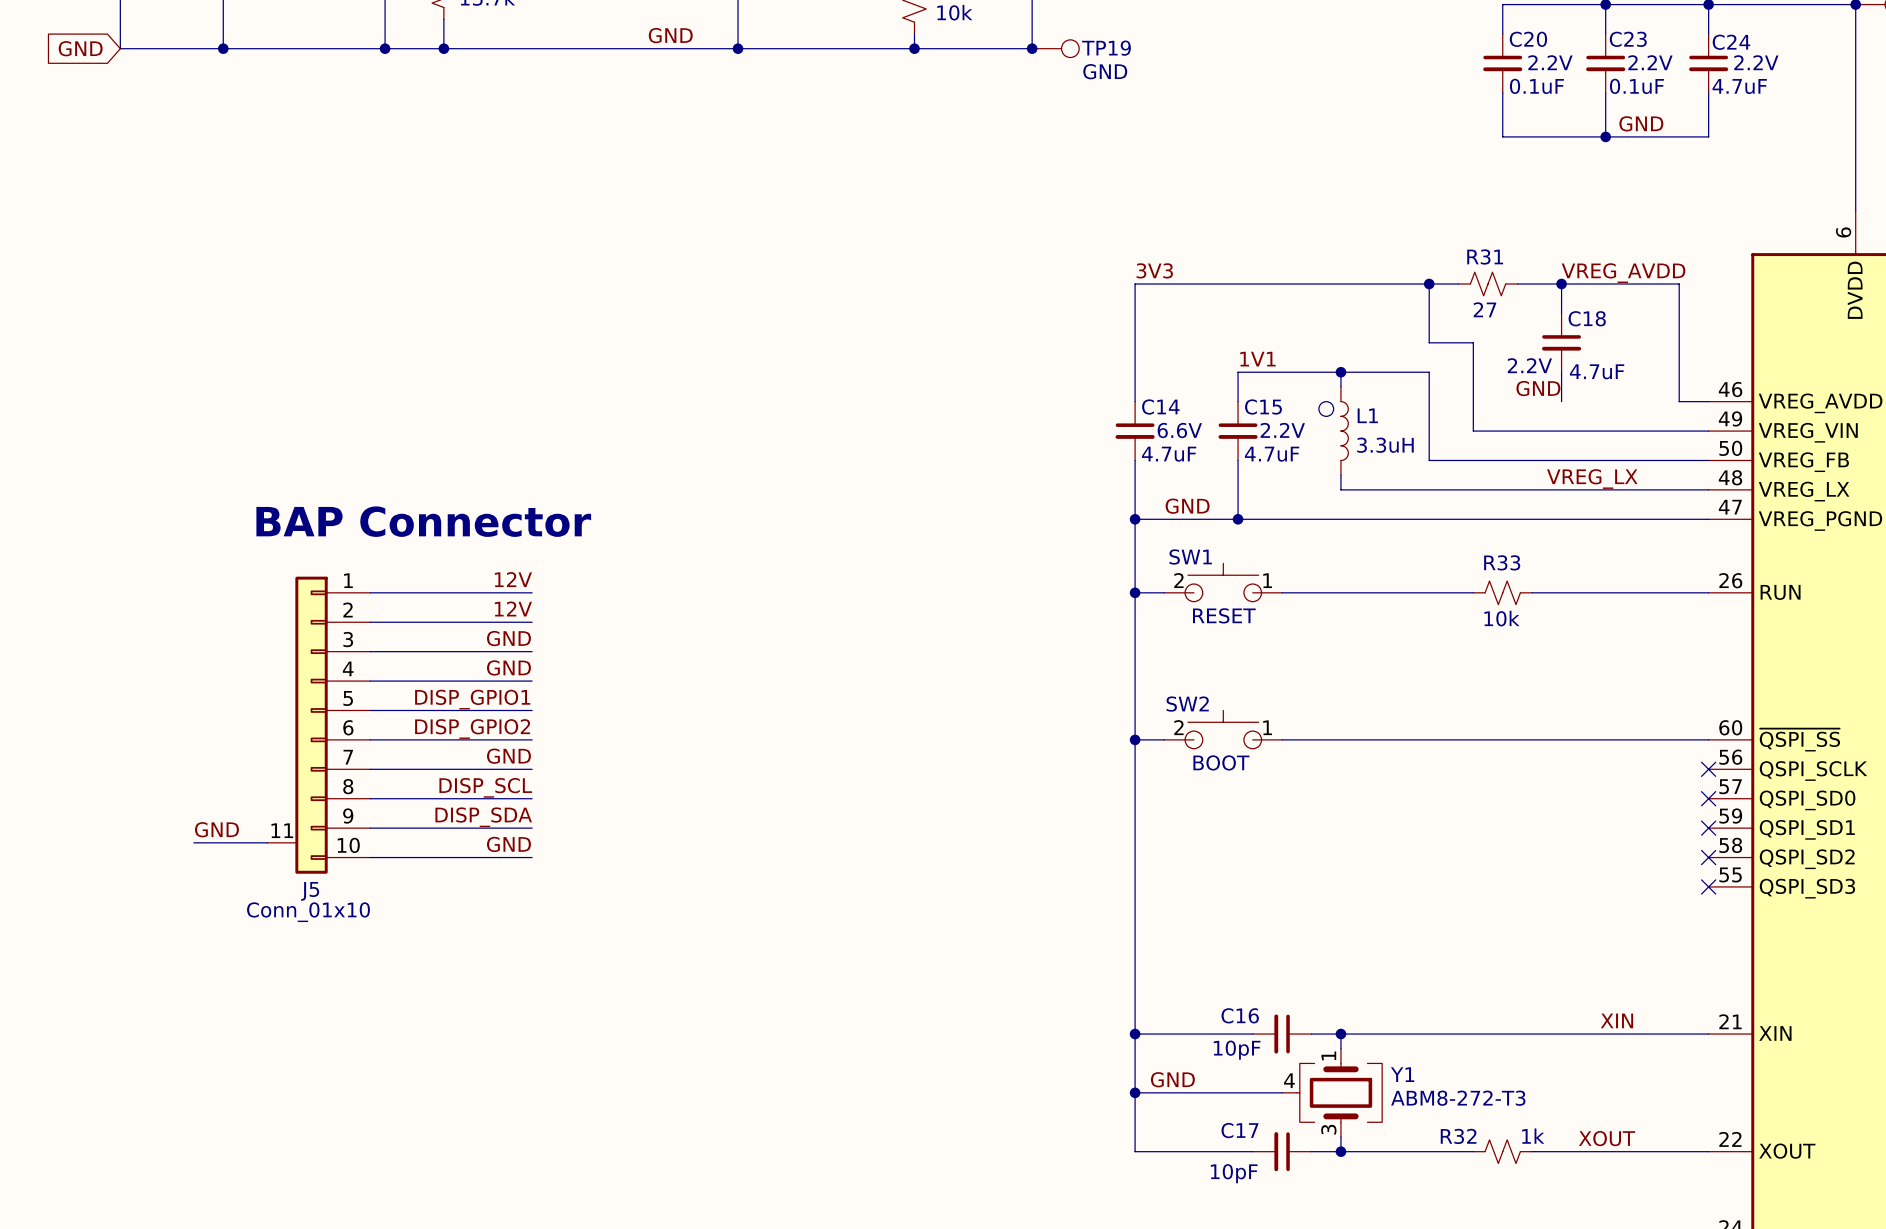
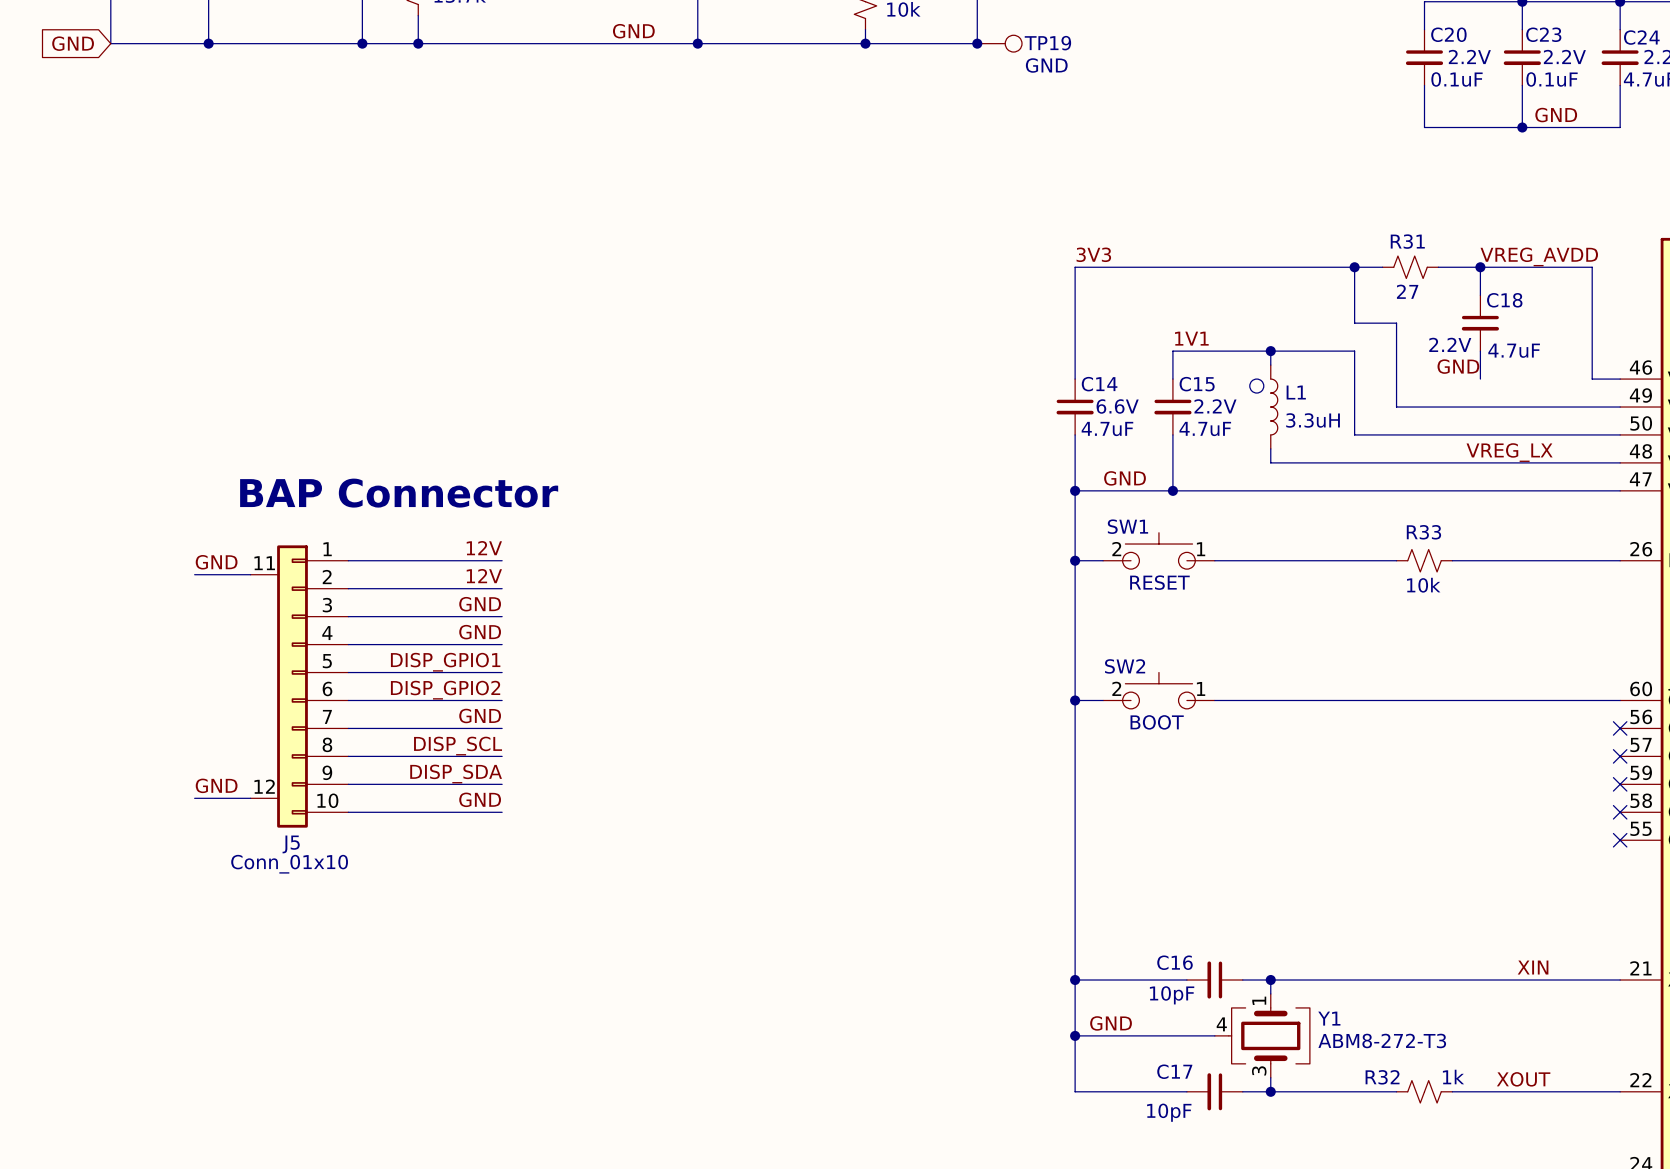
J5 symbol: [267, 576, 371, 874] -> [250, 545, 349, 828]
label: none -> GND (216, 562)
wire: none -> (194, 574) (250, 574)
label position: GND (216, 829) -> GND (216, 785)
wire: (193, 842) (208, 842) -> none

